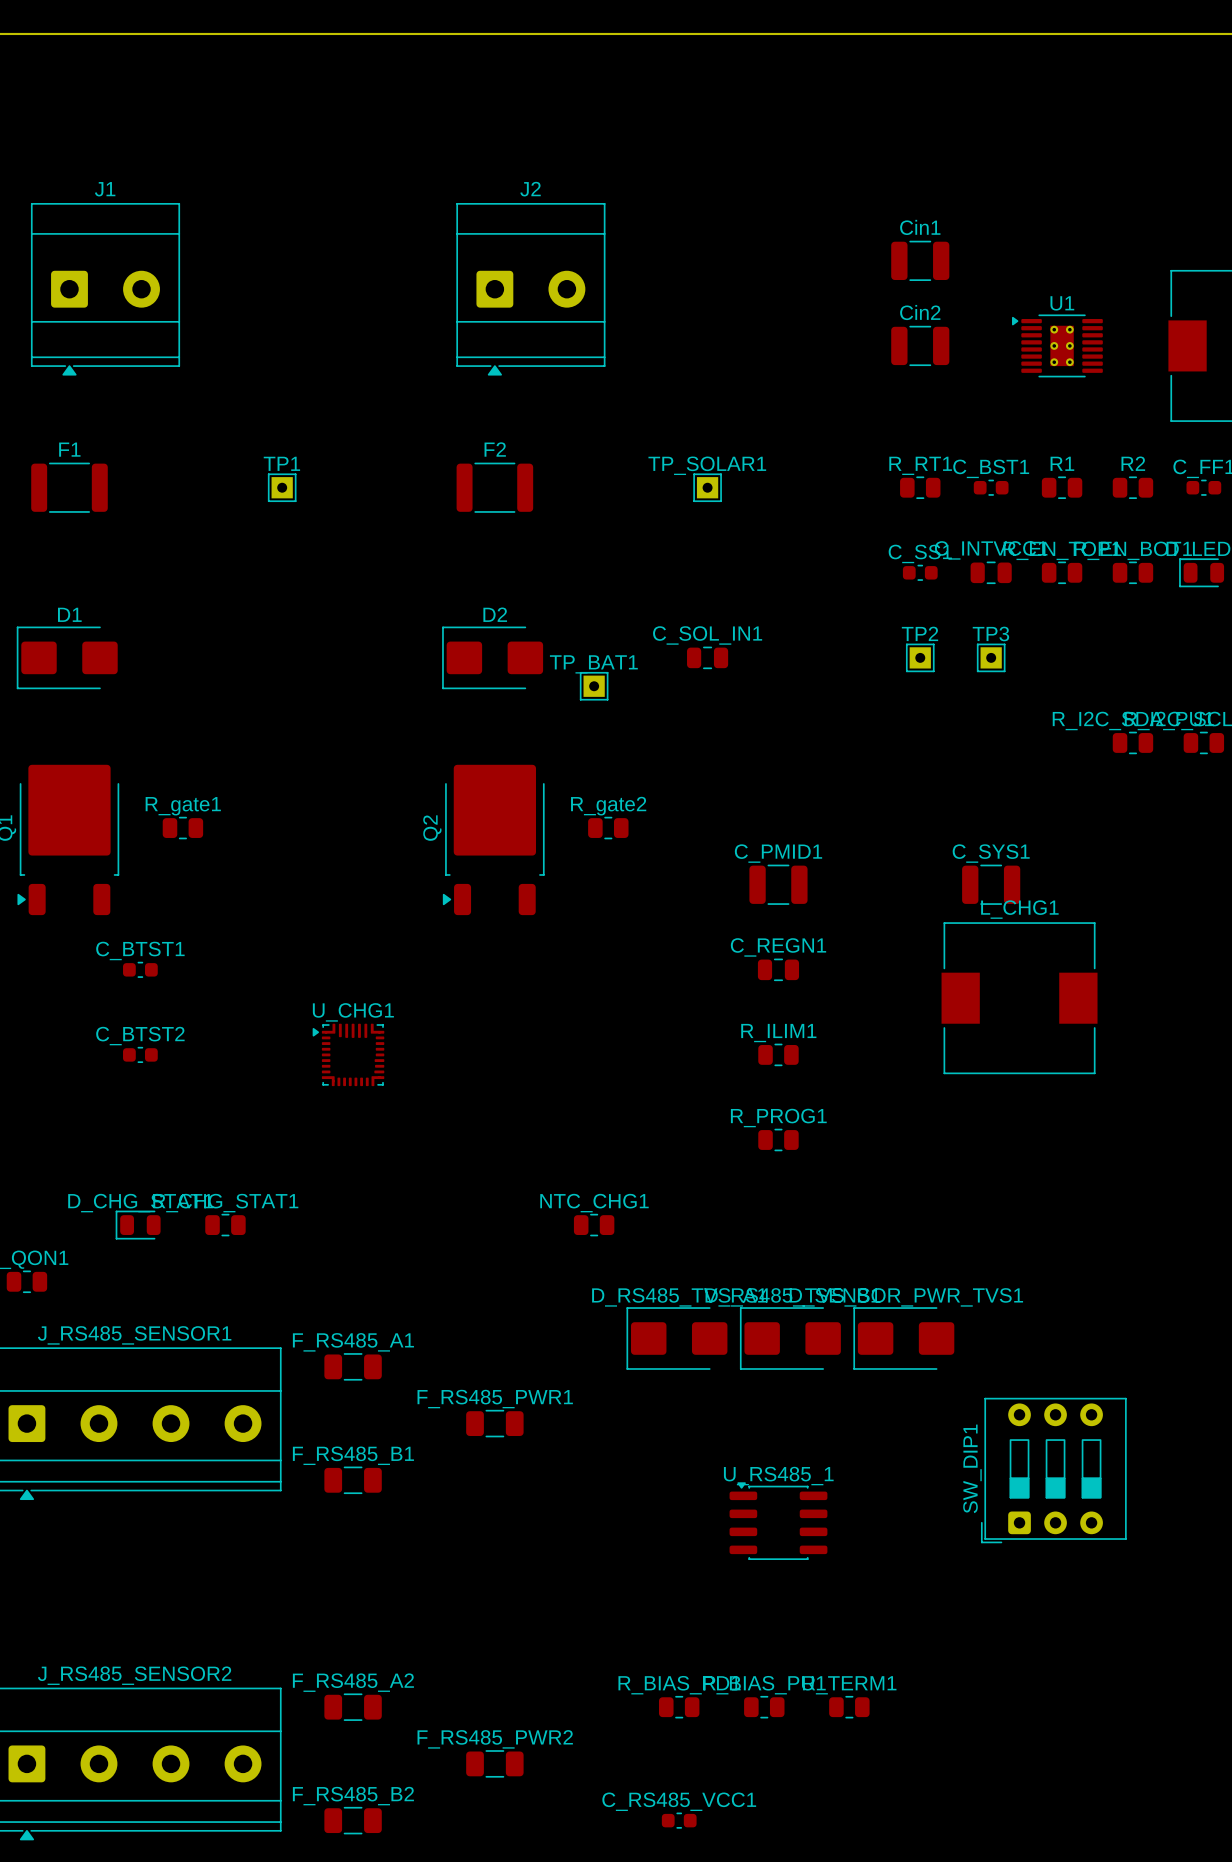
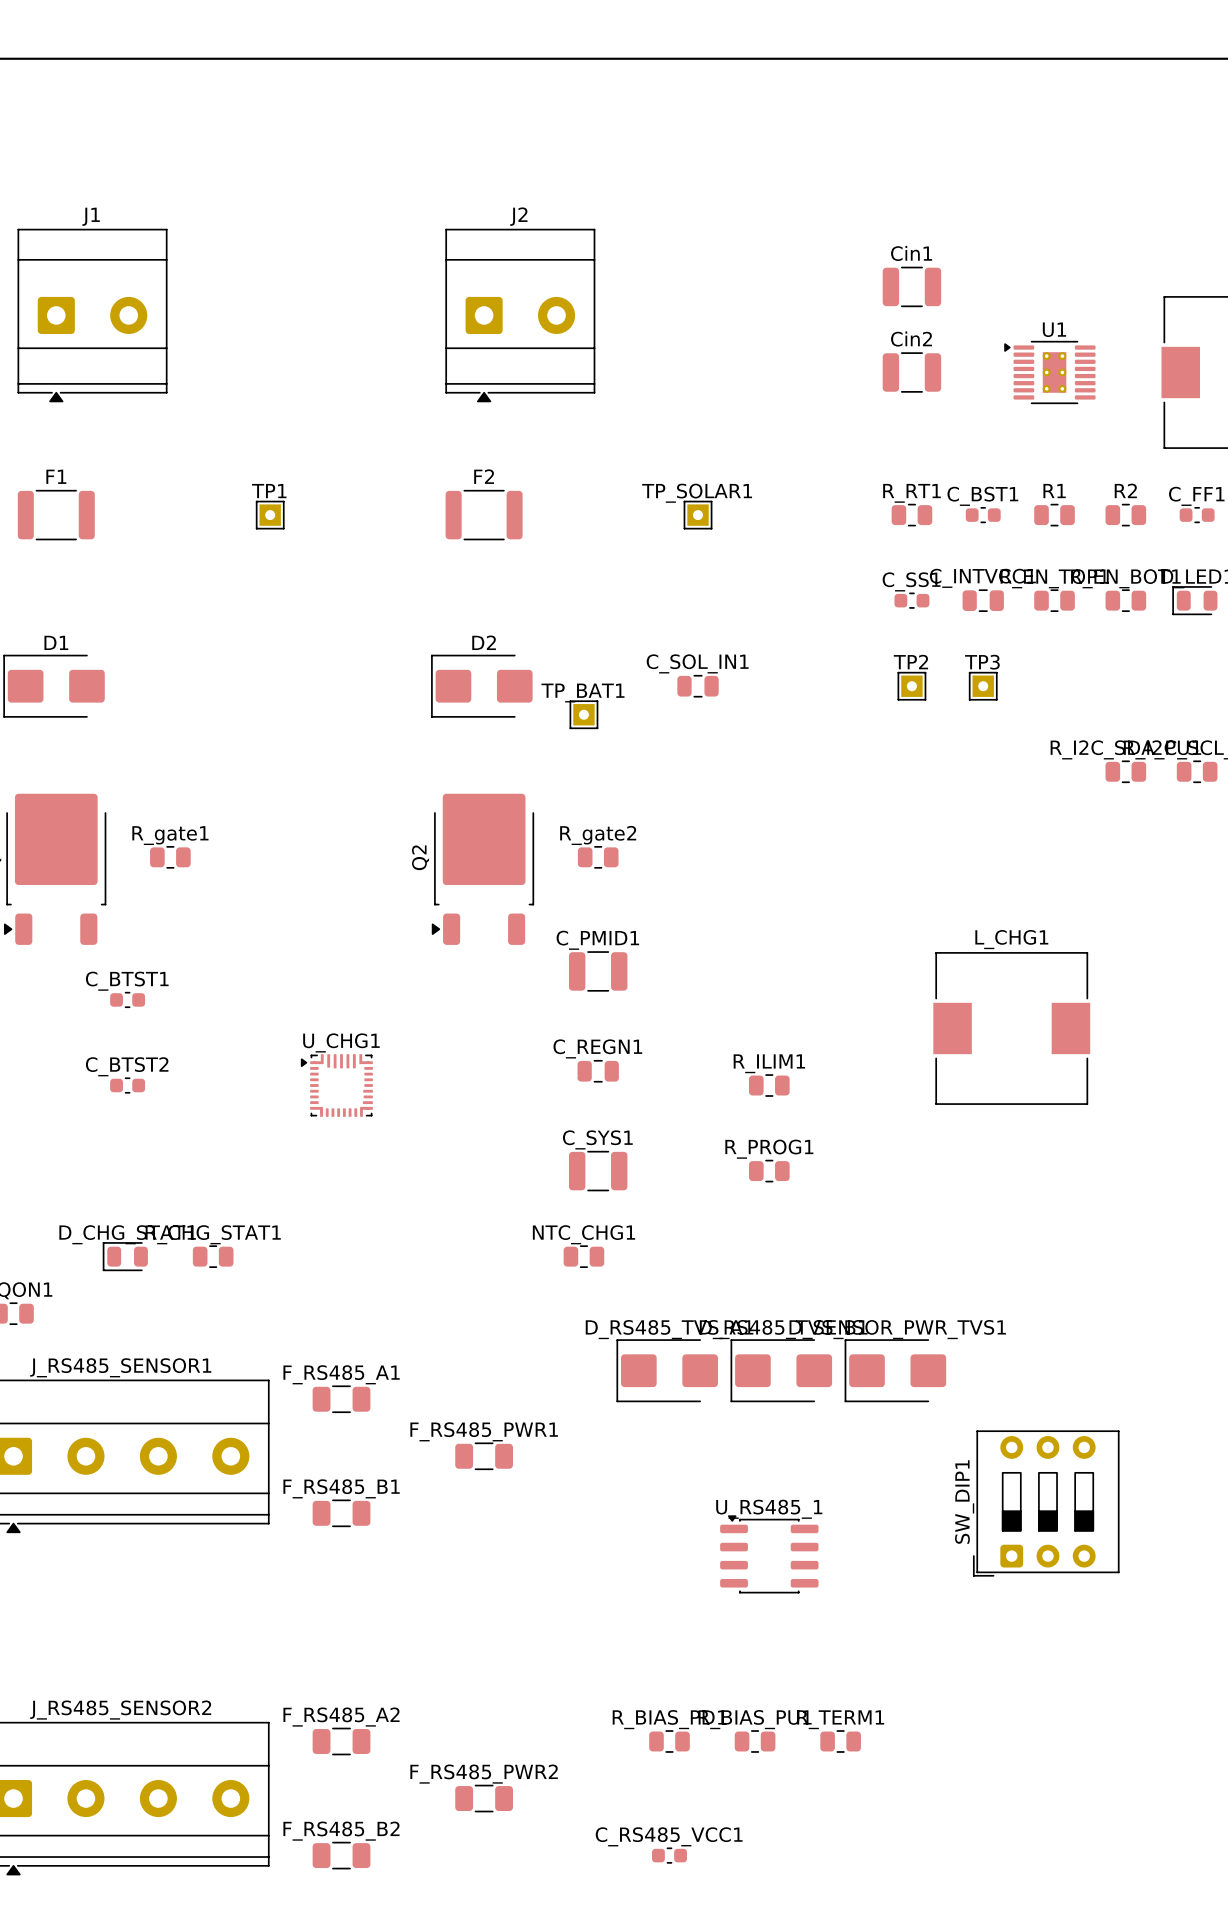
C_PMID1 position: (778, 884) -> (598, 971)
C_SYS1 position: (991, 884) -> (598, 1171)
C_REGN1 position: (778, 969) -> (598, 1071)

